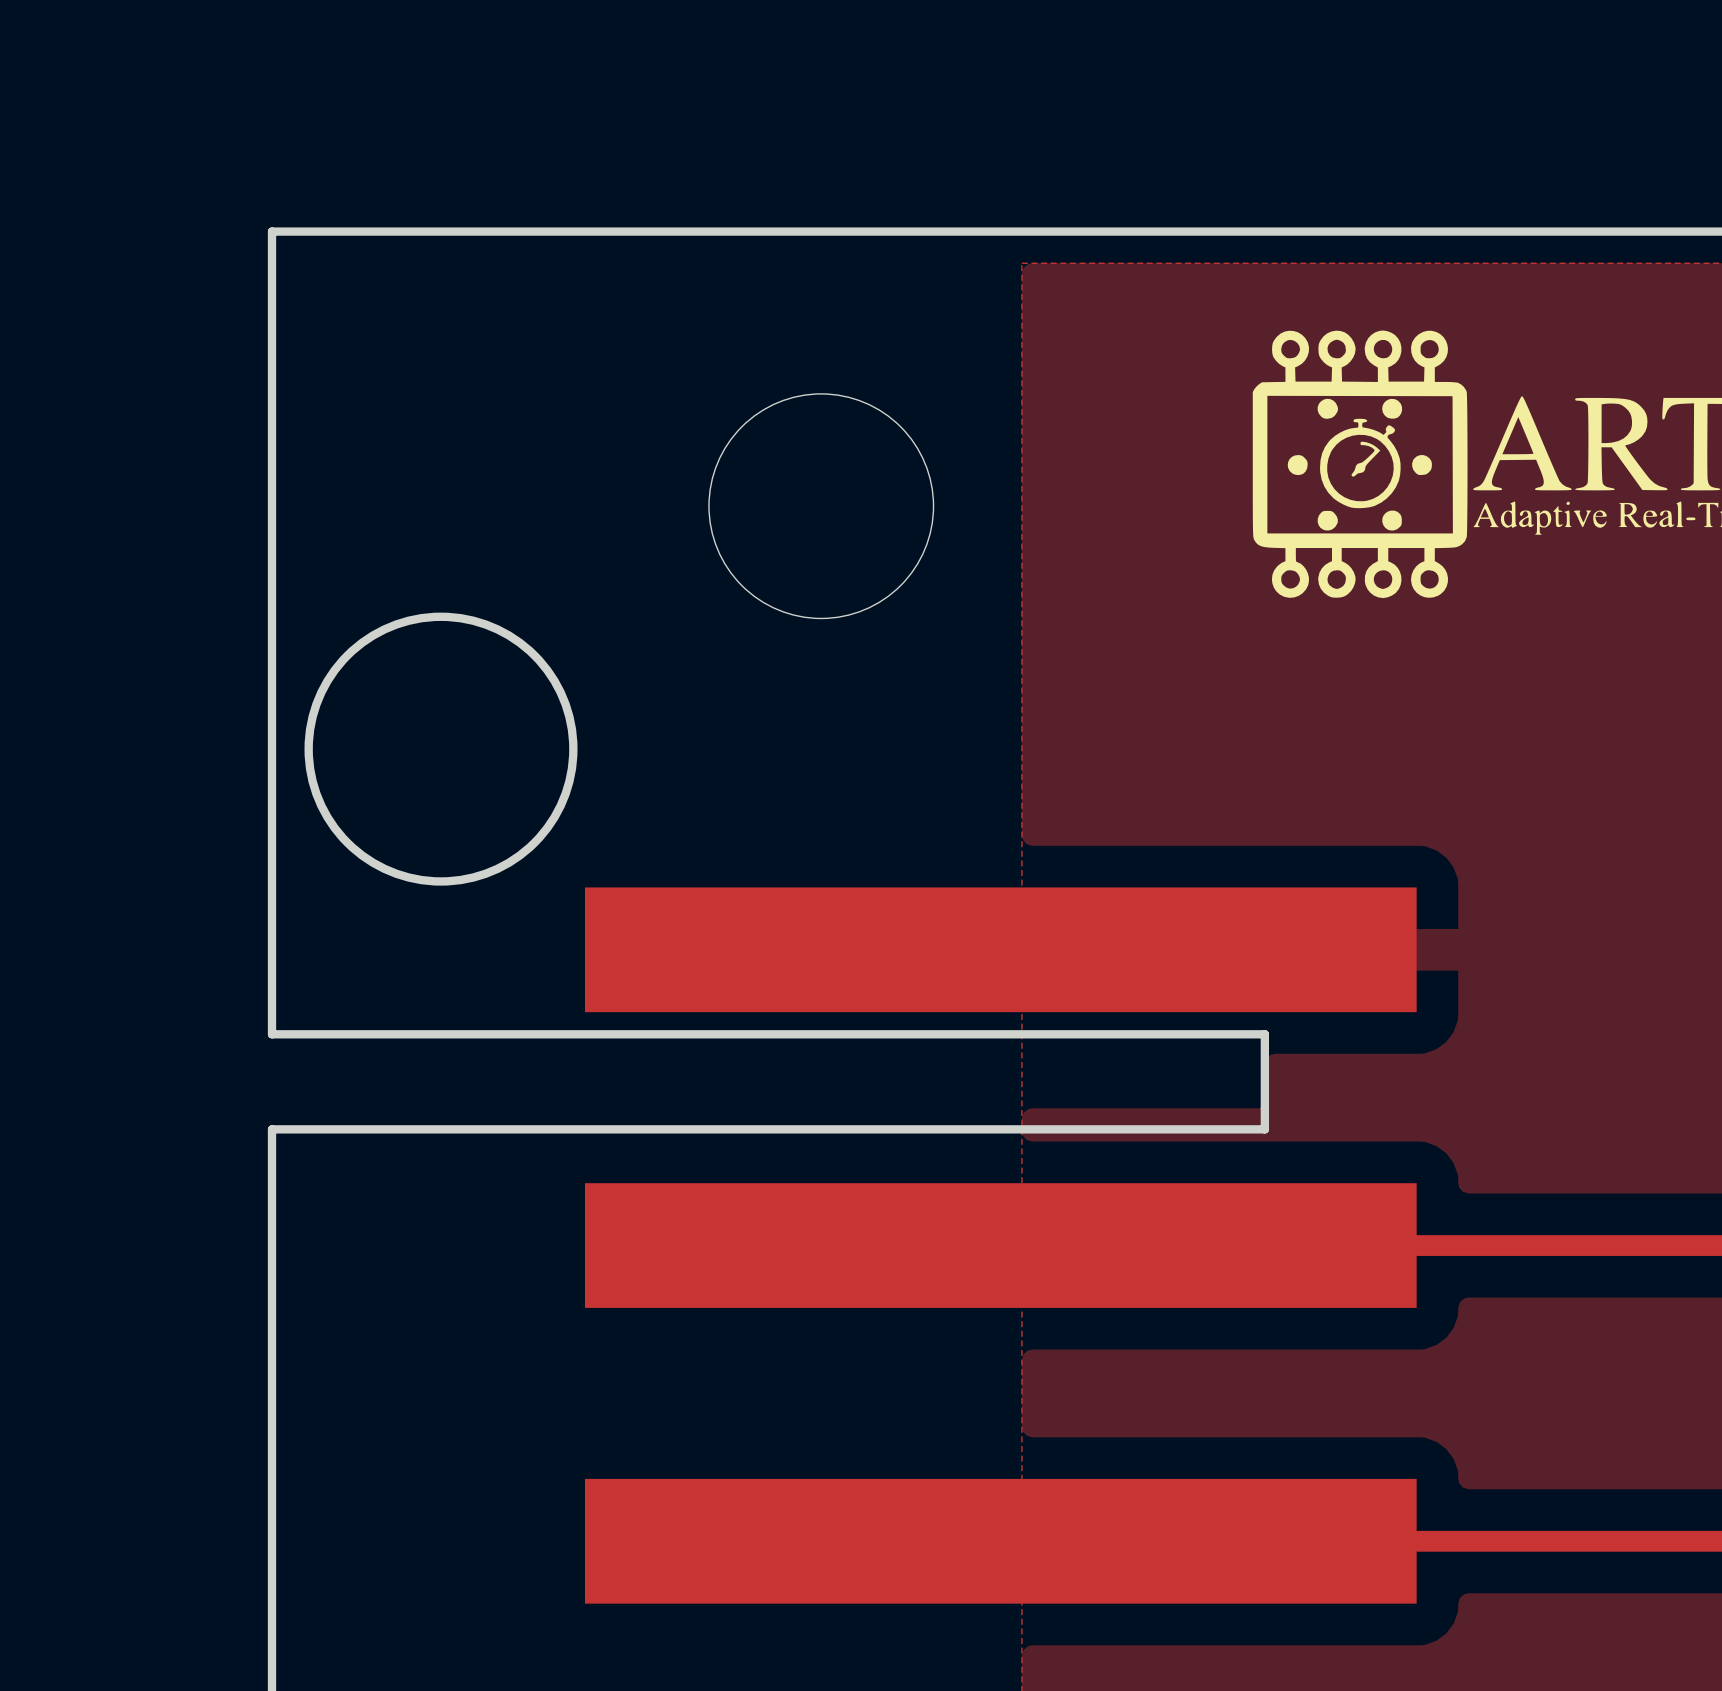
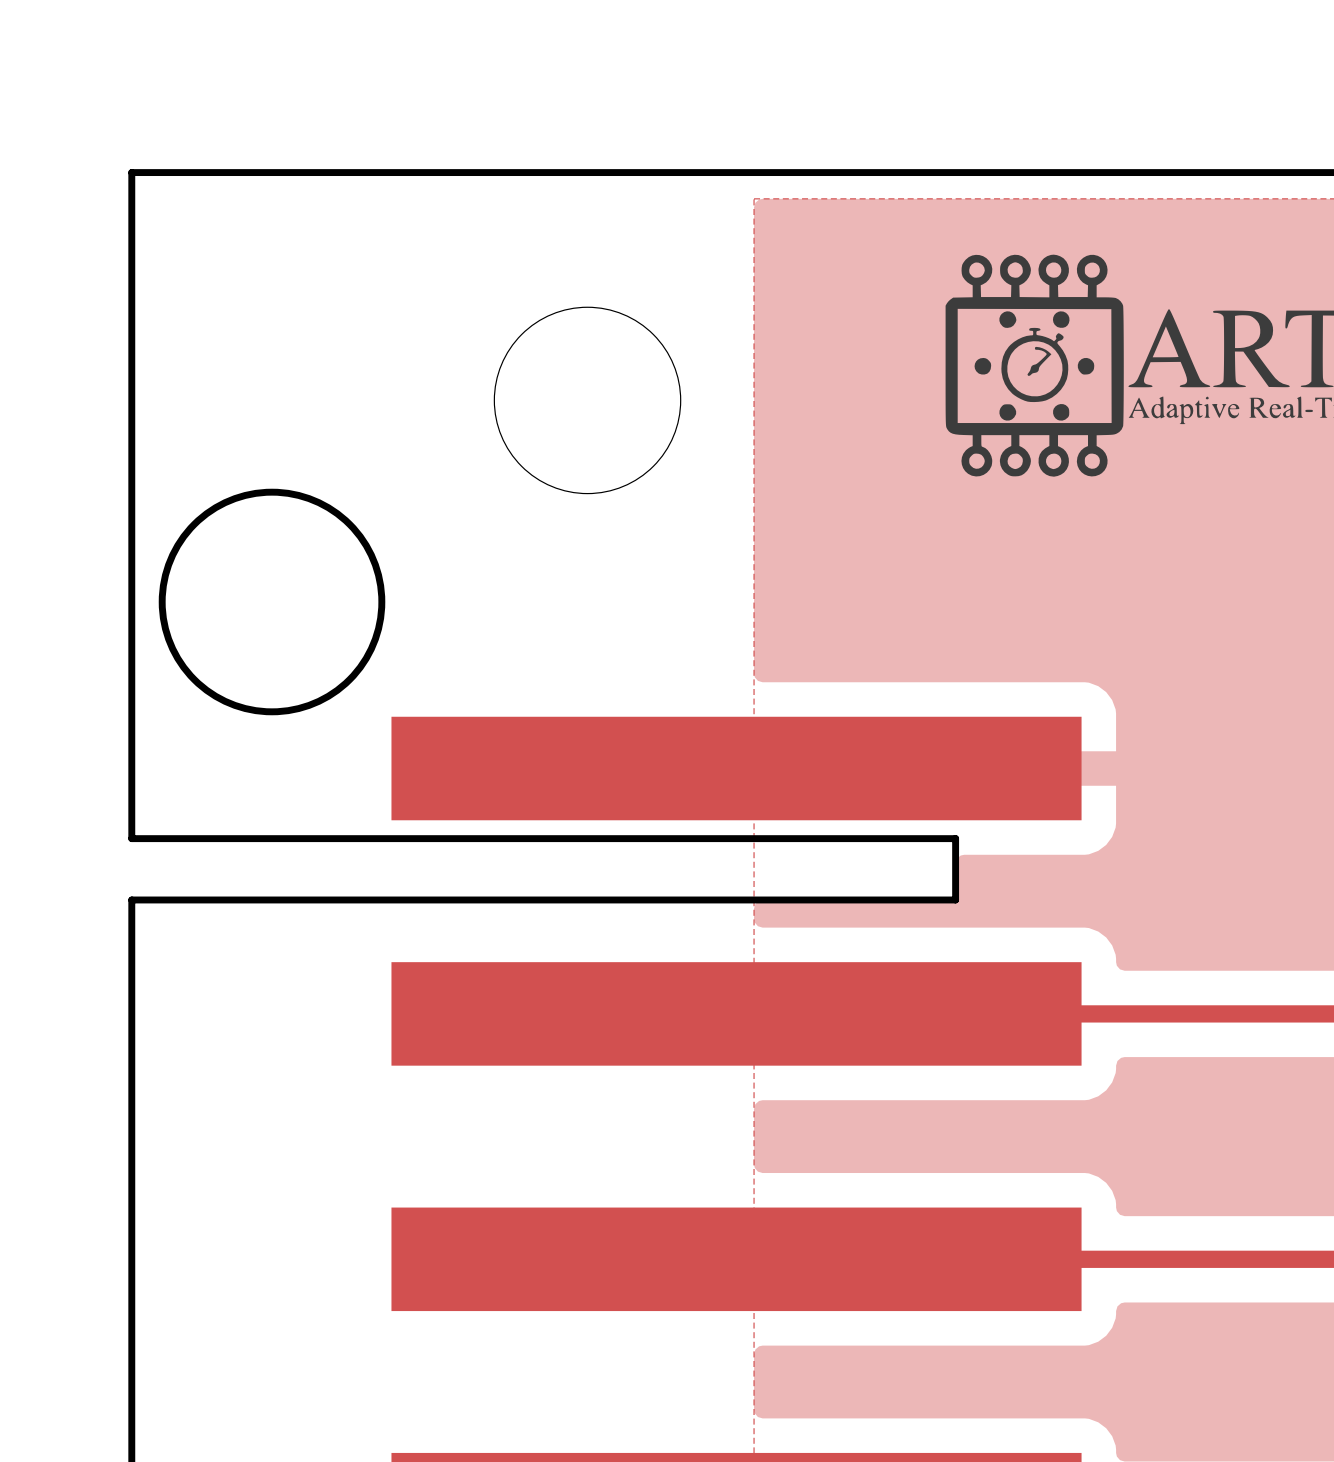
board edge: (1264, 1108) (1264, 1129) (272, 1129) -> (955, 899) (131, 899) (131, 917)

